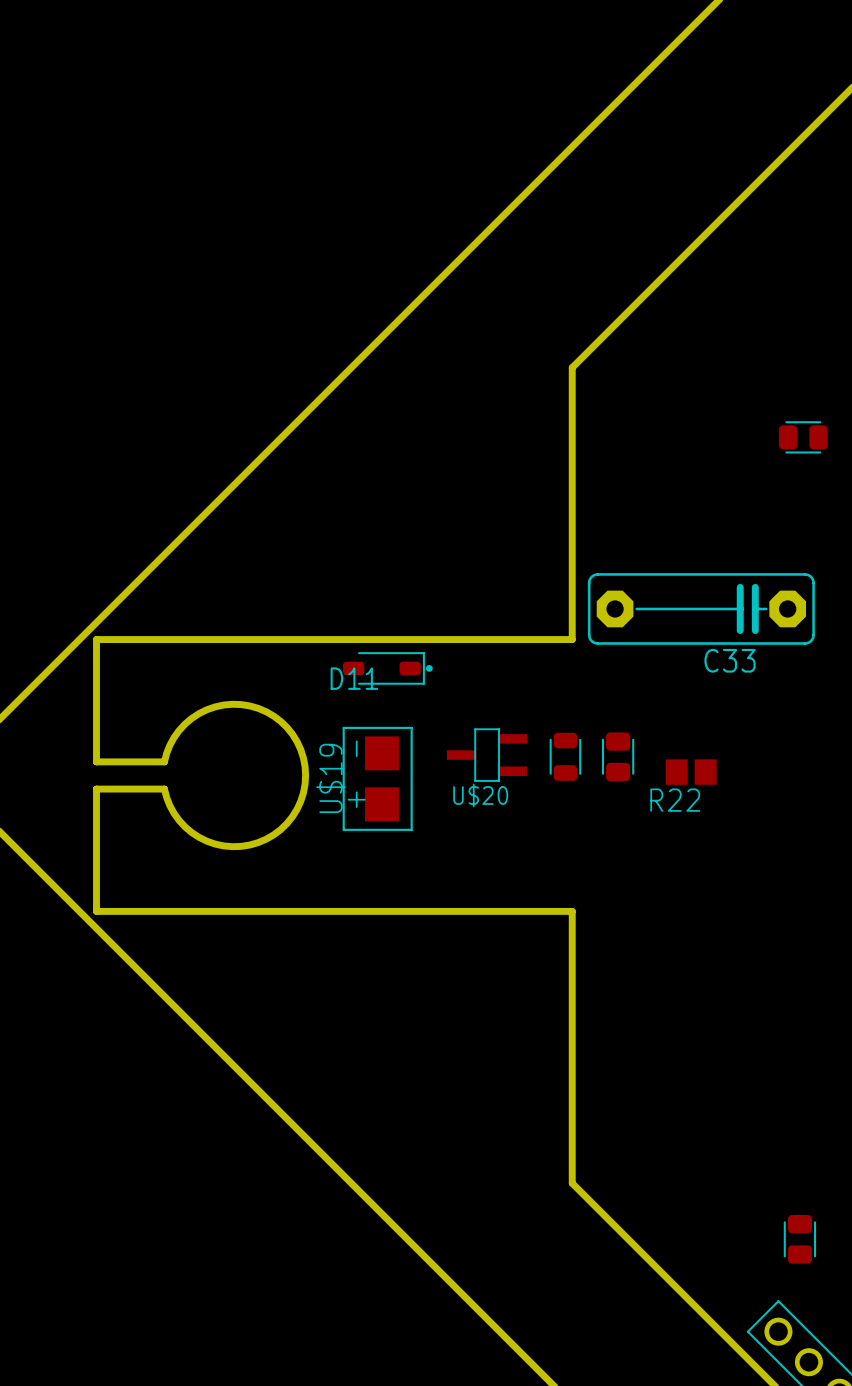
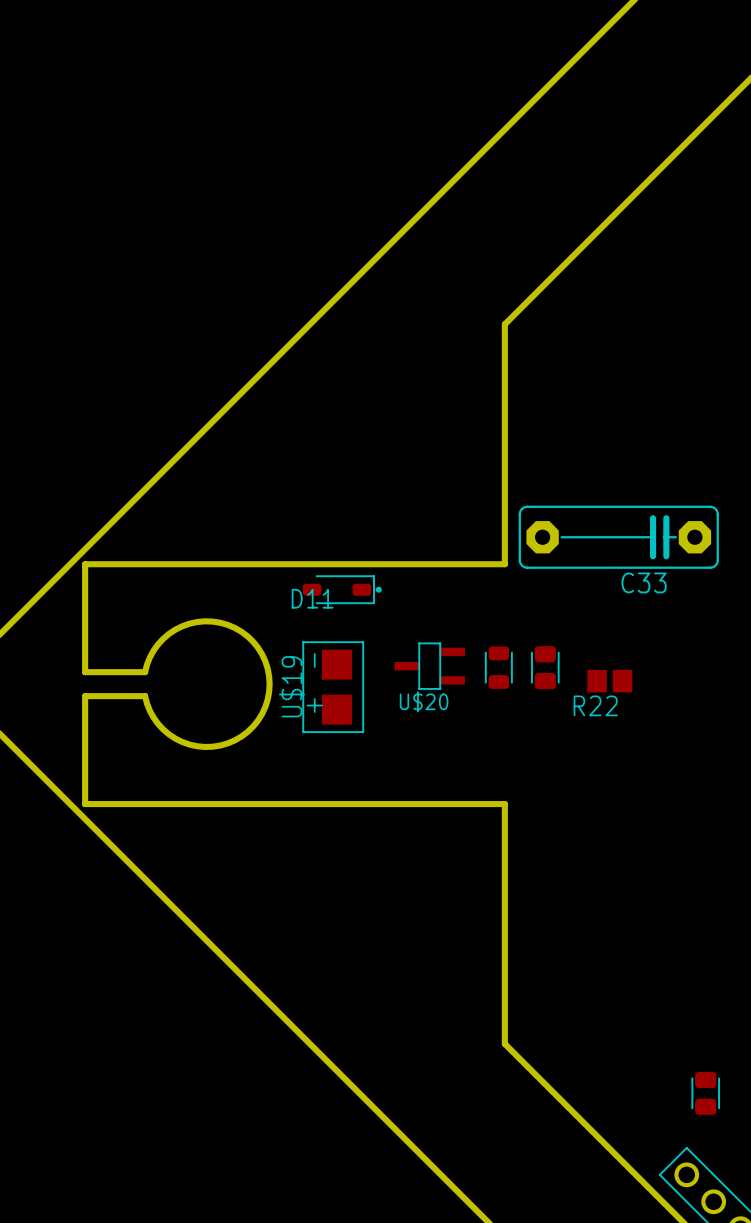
part: (803, 437) -> none

